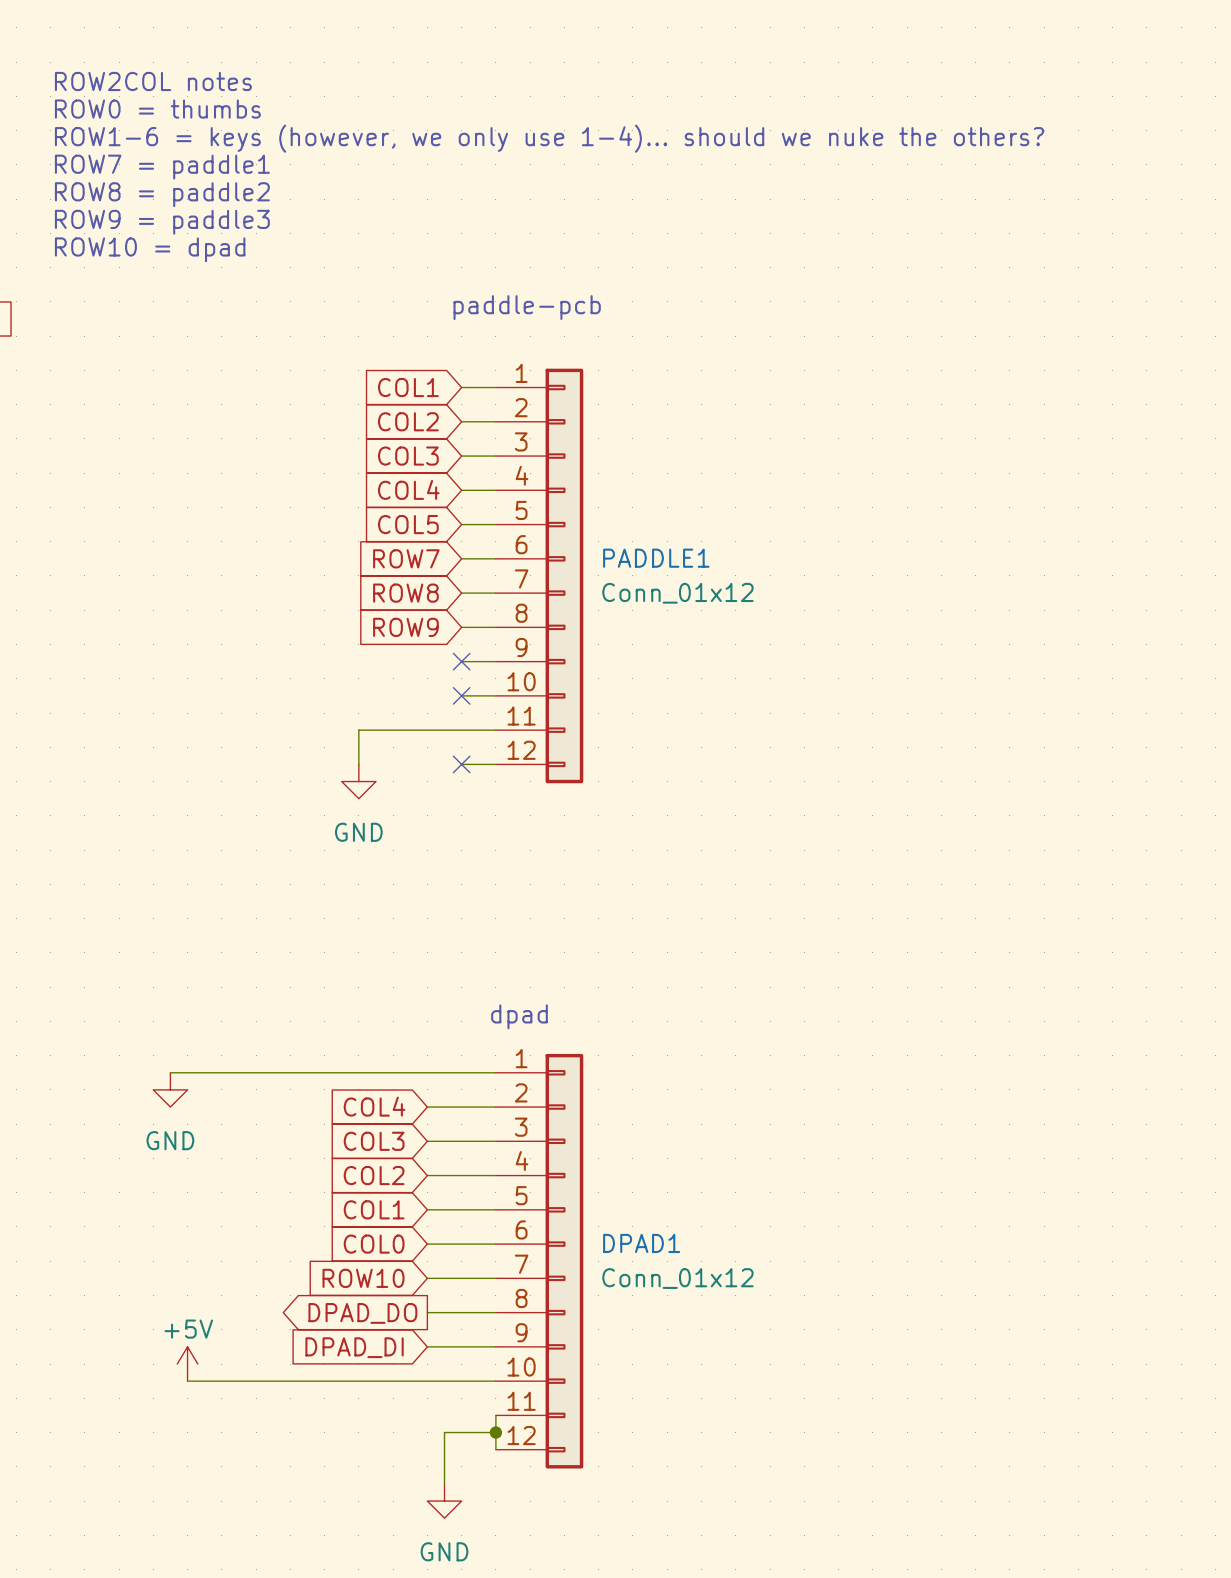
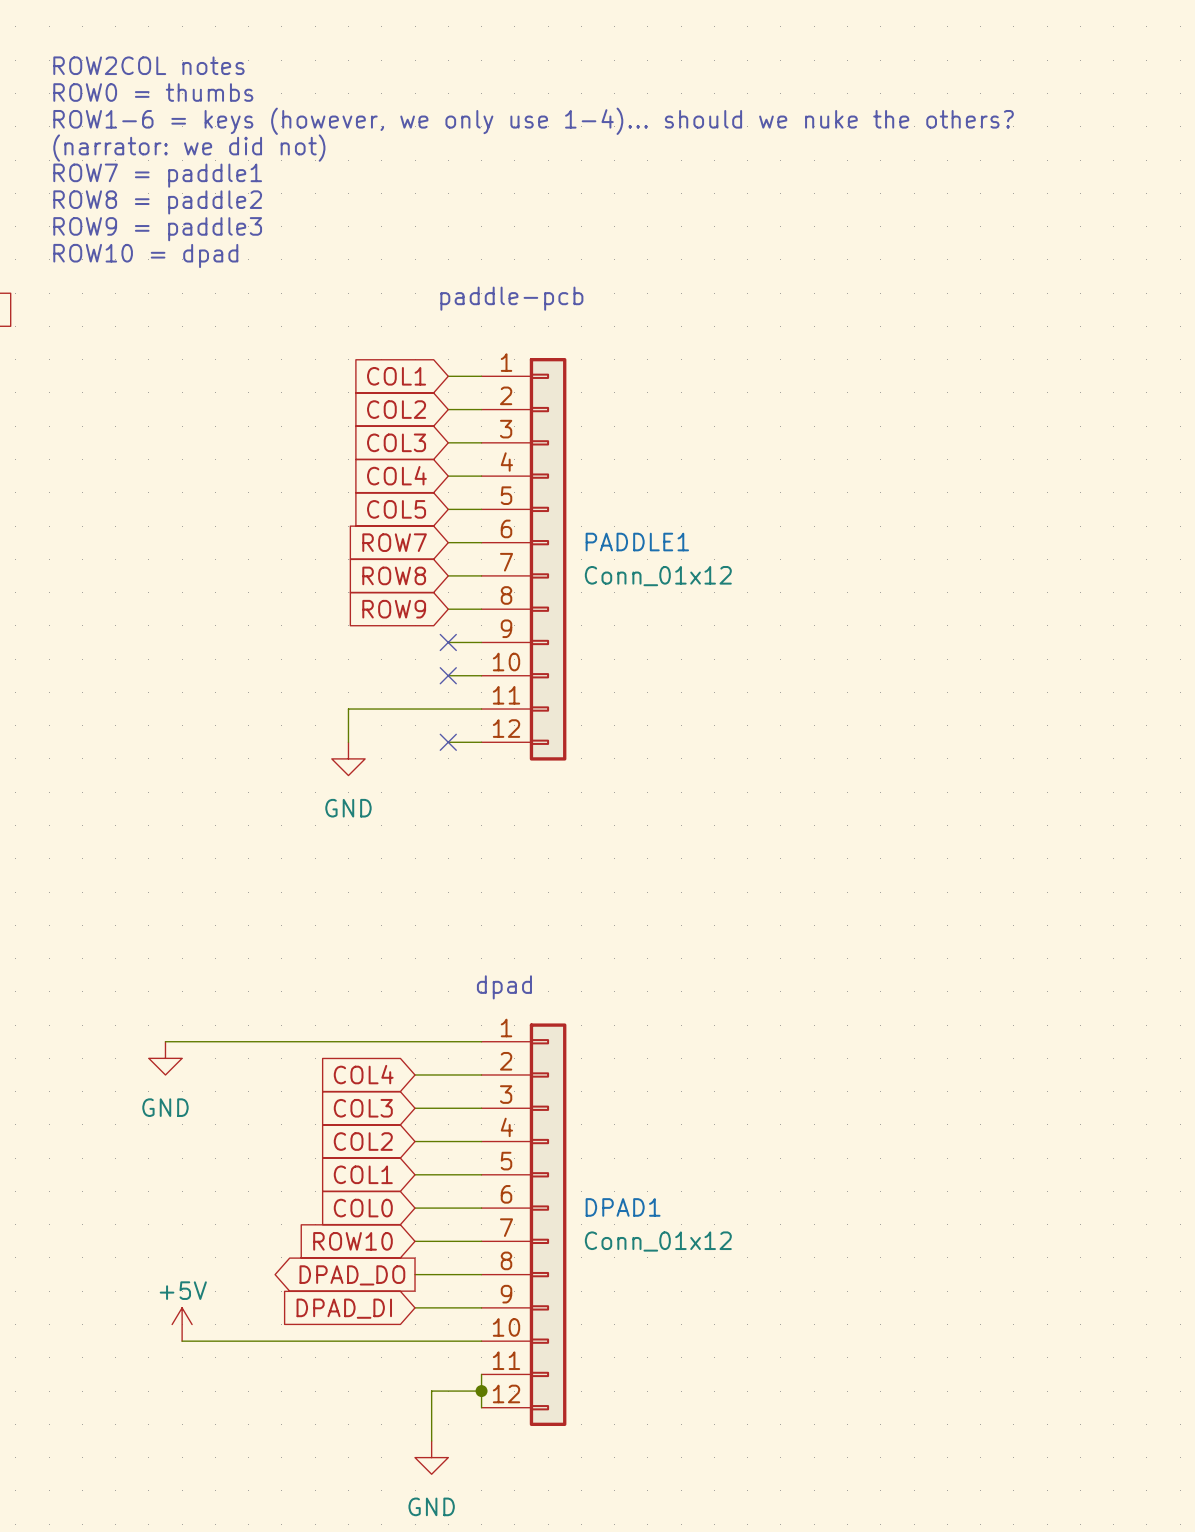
text position: ROW2COL notes (153, 81) -> ROW2COL notes (148, 65)
text position: ROW0 = thumbs (157, 109) -> ROW0 = thumbs (153, 92)
text position: ROW1-6 = keys (however, we only use 1-4)... should we nuke the others? (549, 138) -> ROW1-6 = keys (however, we only use 1-4)... should we nuke the others? (533, 121)
text: none -> (narrator: we did not) (189, 148)
text position: ROW7 = paddle1 (162, 167) -> ROW7 = paddle1 (157, 175)
text position: ROW8 = paddle2 (162, 194) -> ROW8 = paddle2 (157, 202)
text position: ROW9 = paddle3 (162, 222) -> ROW9 = paddle3 (157, 229)
text position: ROW10 = dpad (150, 249) -> ROW10 = dpad (145, 255)

